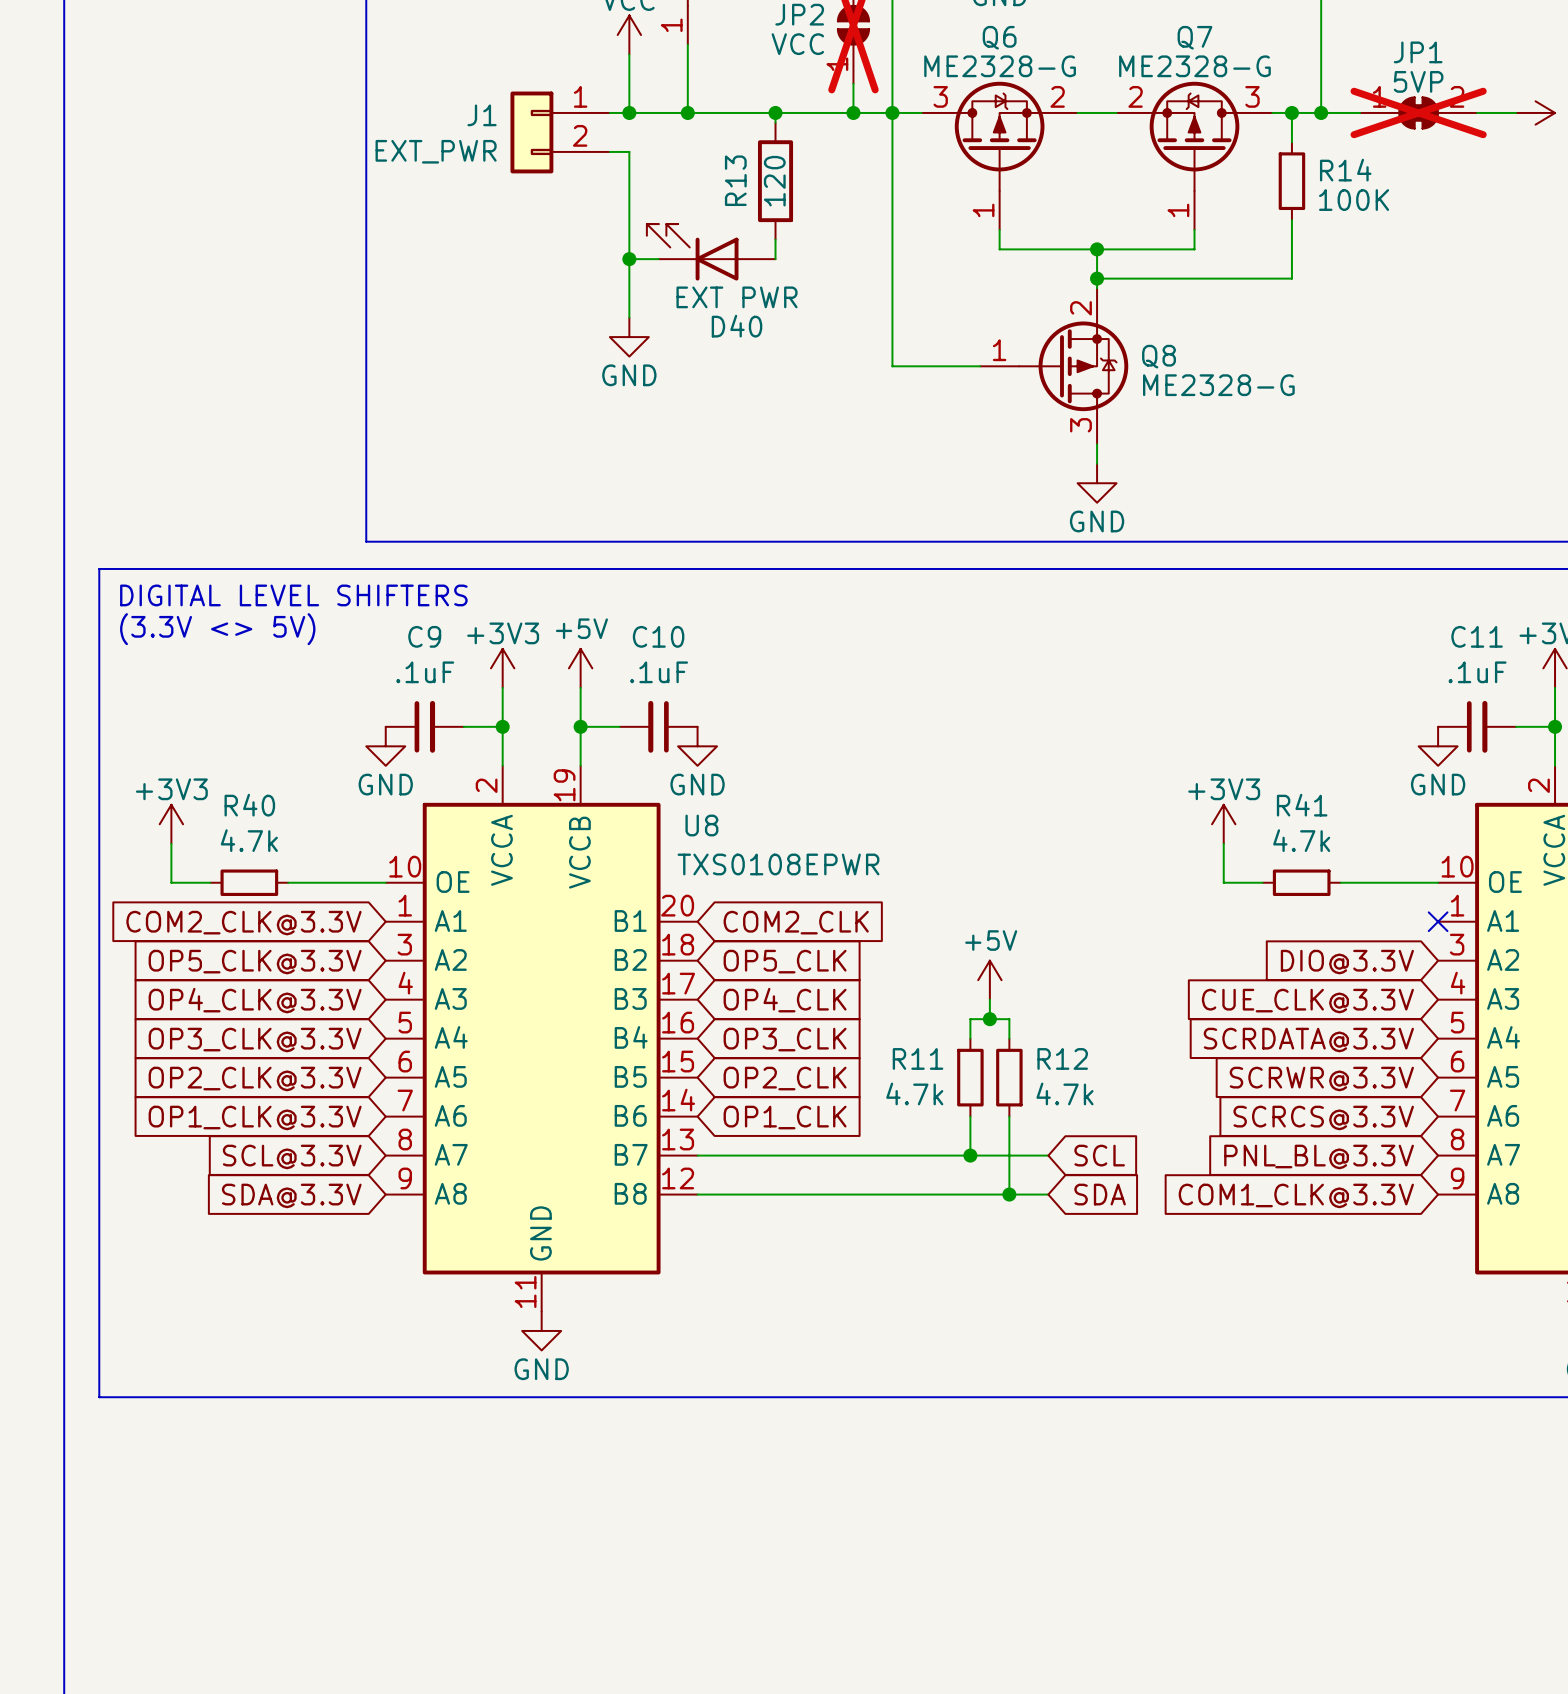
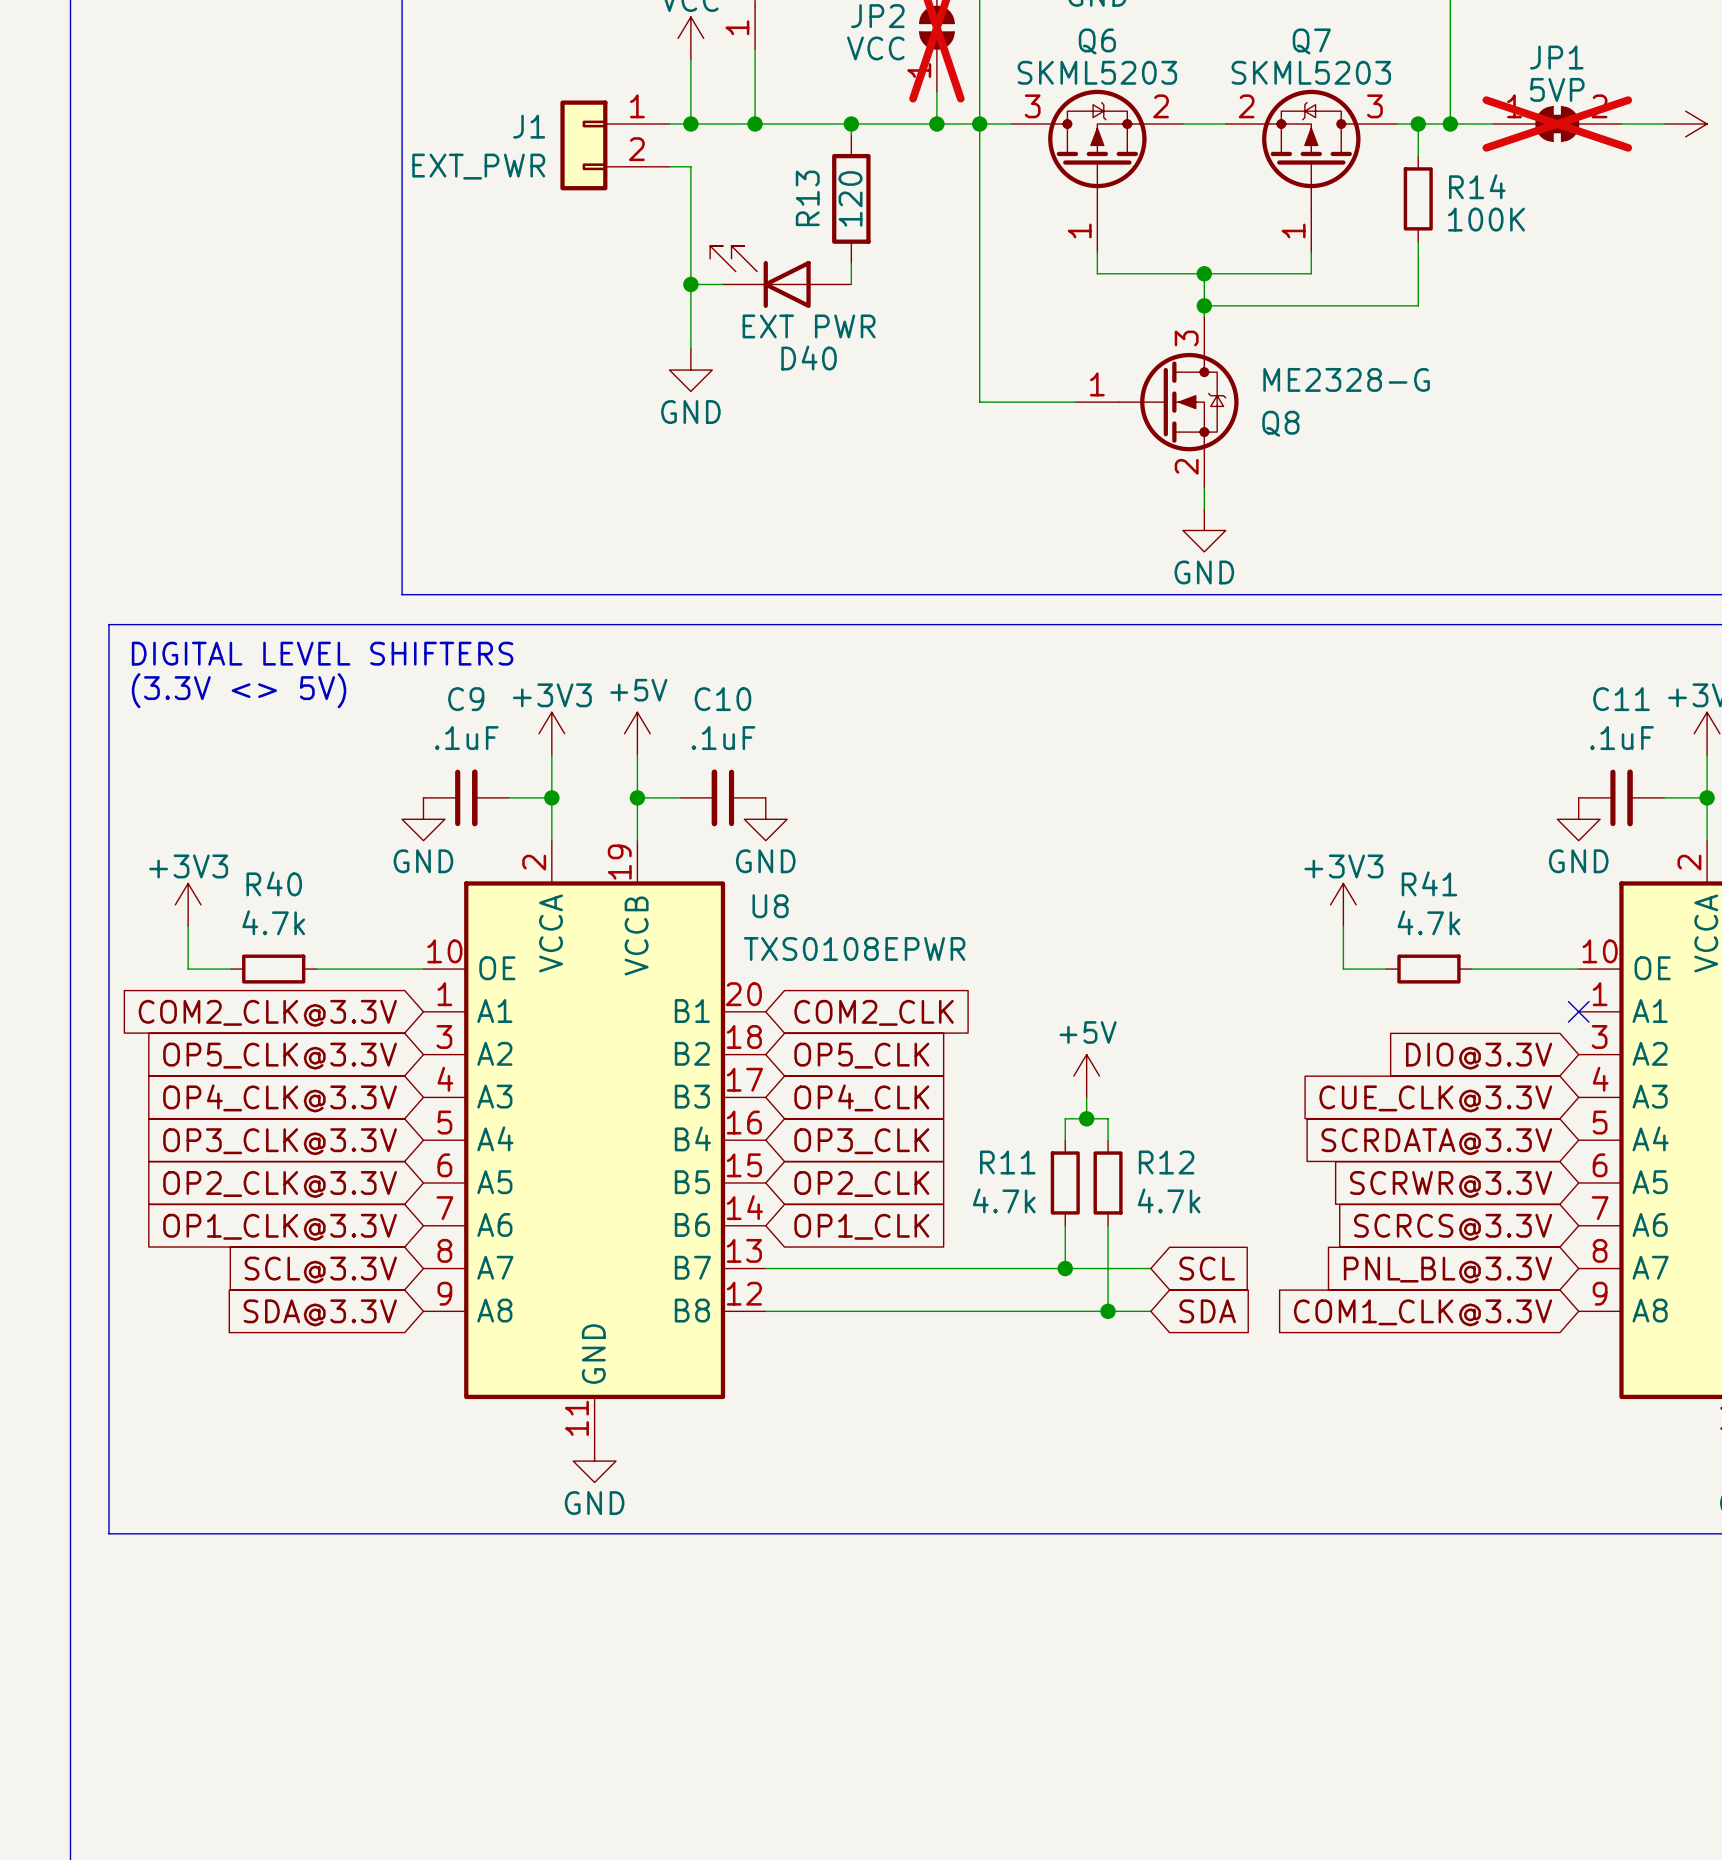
Q6 value: ME2328-G (1000, 66) -> SKML5203 (1097, 72)
Q7 value: ME2328-G (1194, 66) -> SKML5203 (1311, 72)
Q8 symbol: [980, 288, 1129, 445] -> [1075, 316, 1239, 488]
Q8 value position: ME2328-G (1218, 385) -> ME2328-G (1346, 379)

